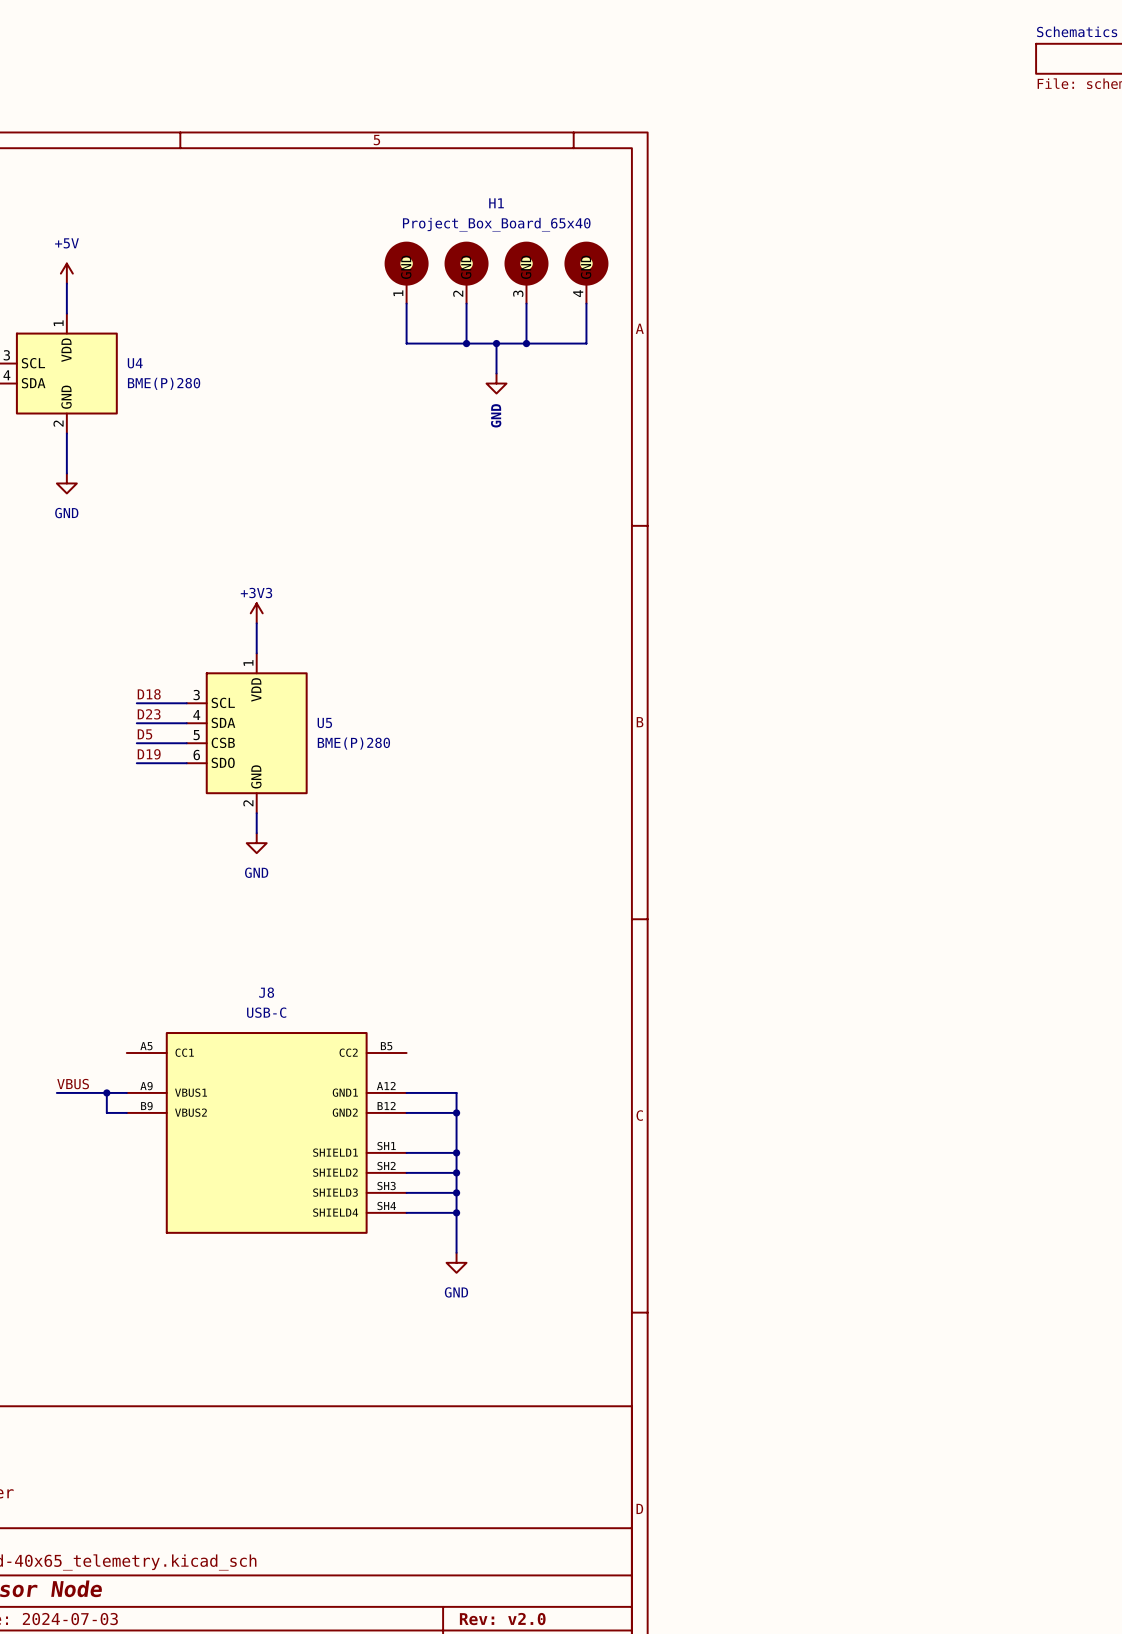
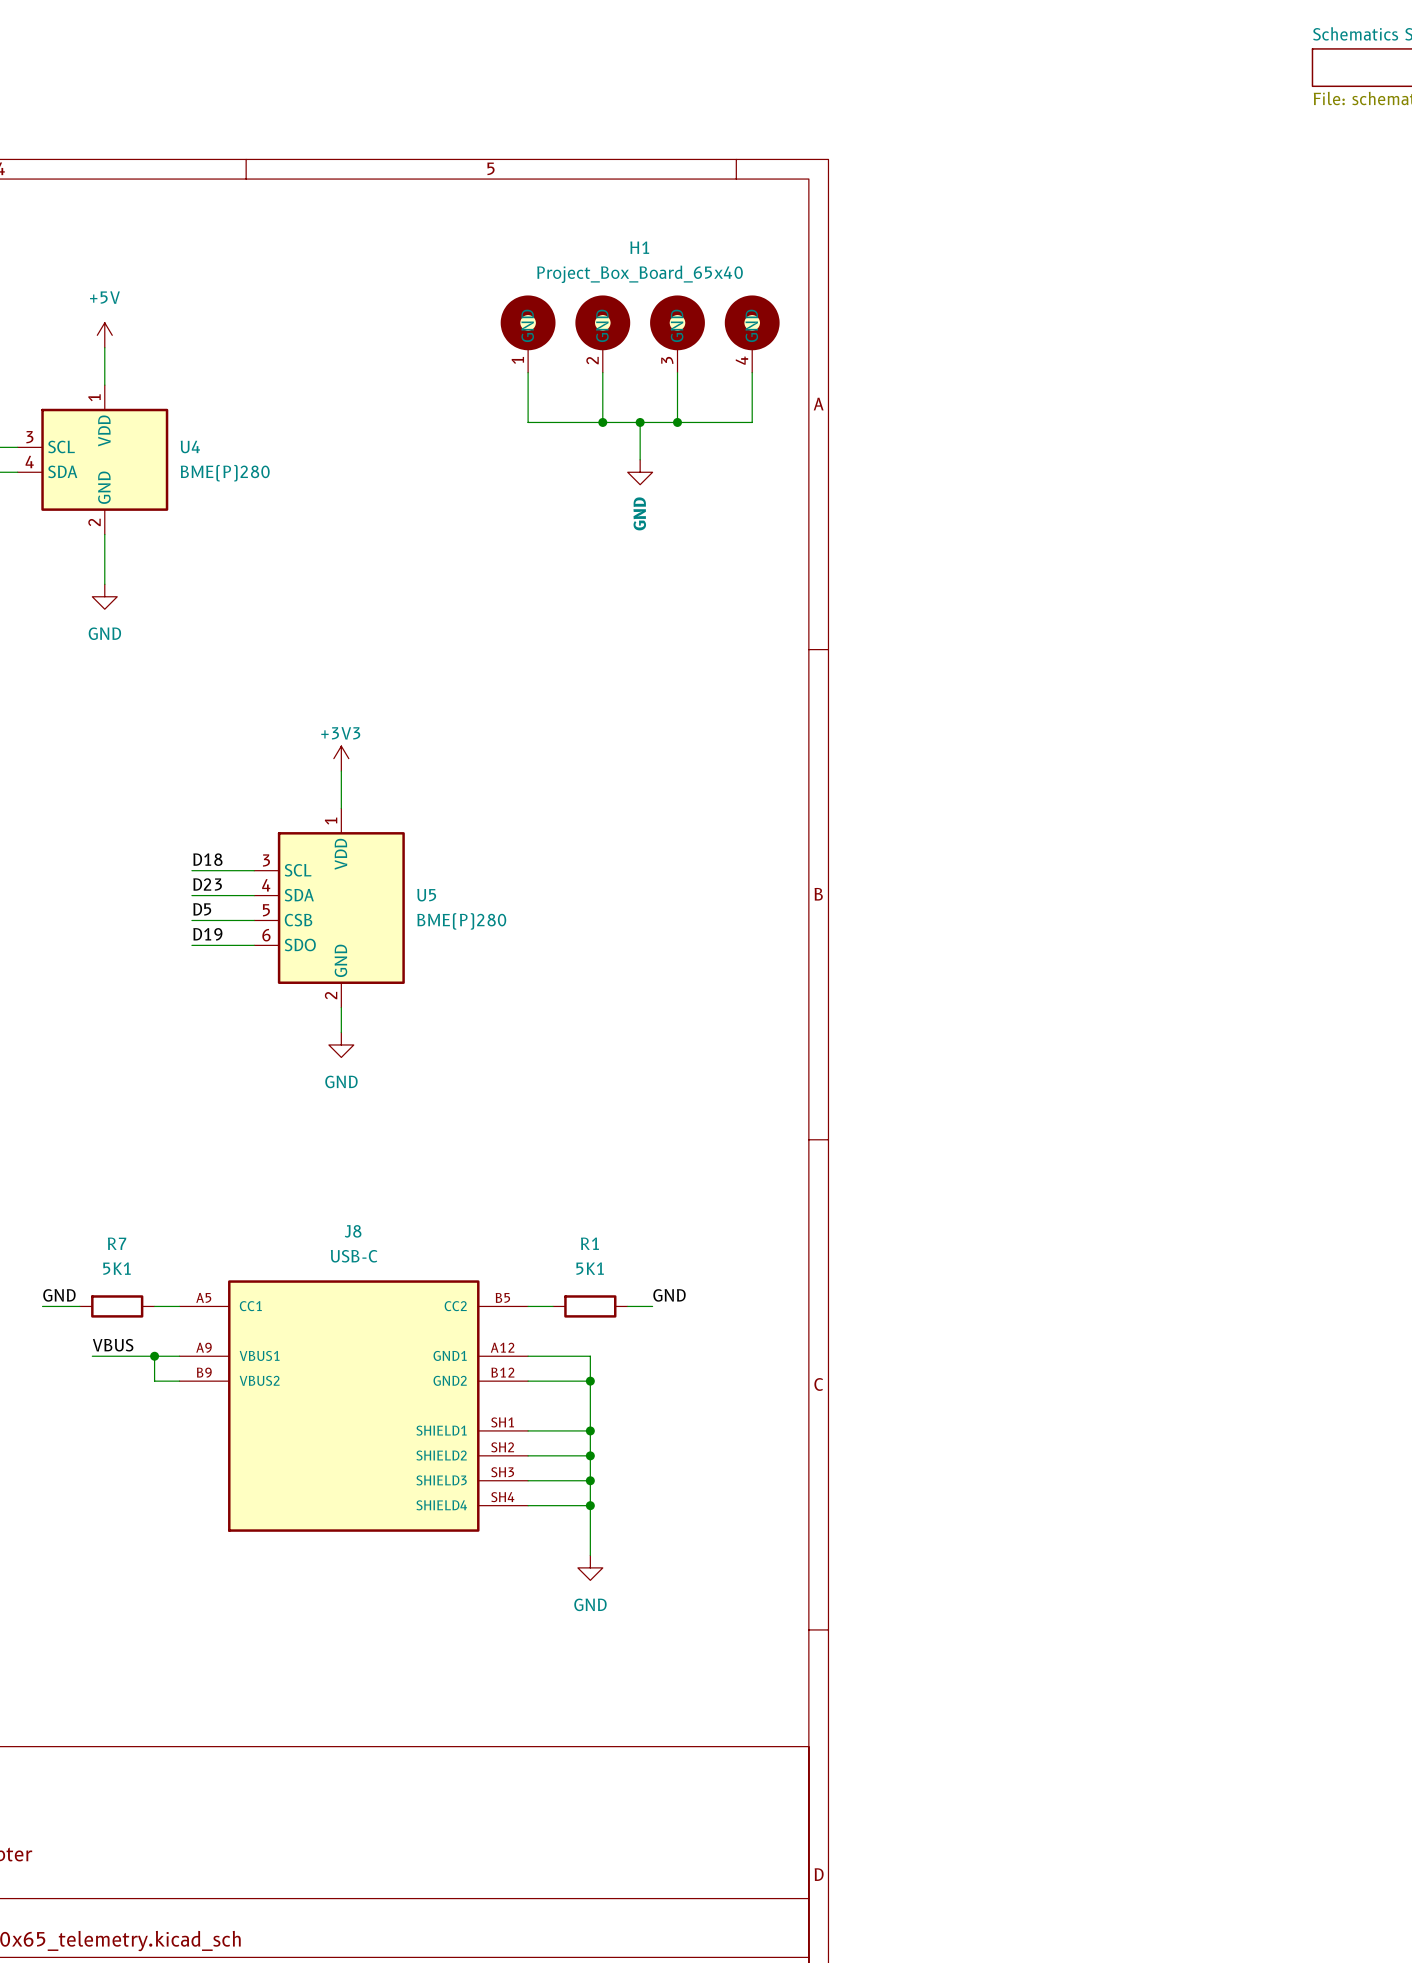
label: none -> GND (59, 1295)
label: none -> GND (669, 1295)
wire: none -> (42, 1306) (79, 1306)
R7: none -> 5K1 (117, 1306)
wire: none -> (154, 1306) (179, 1306)
wire: none -> (528, 1306) (552, 1306)
R1: none -> 5K1 (590, 1306)
wire: none -> (627, 1306) (652, 1306)

